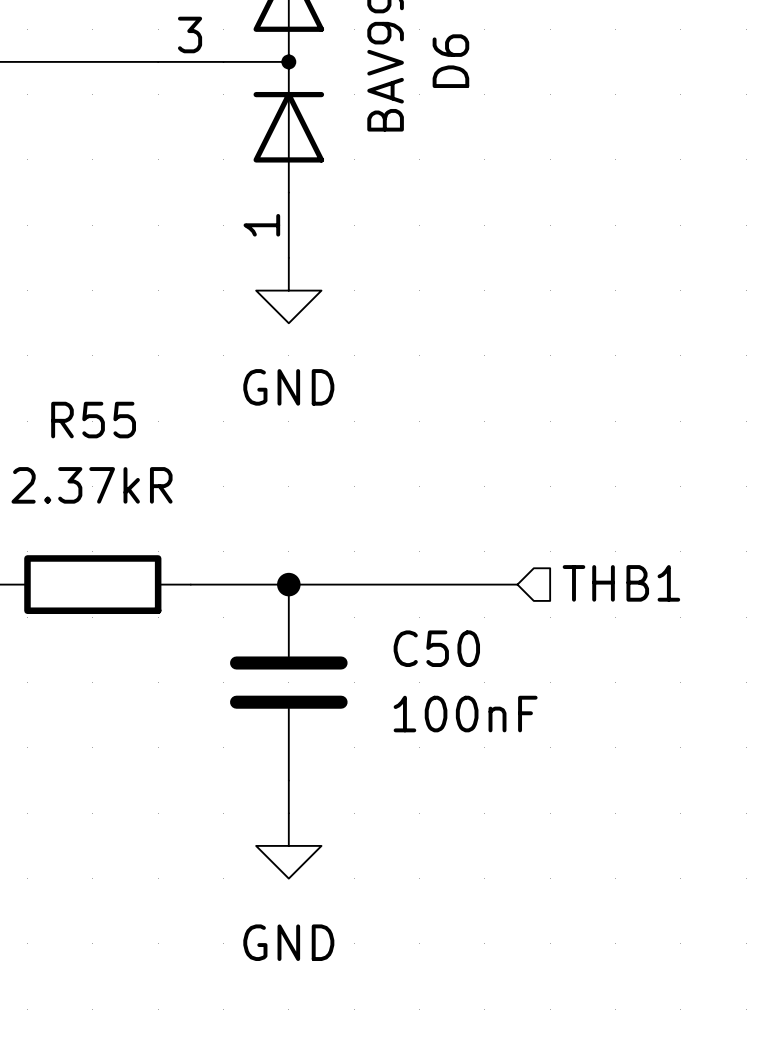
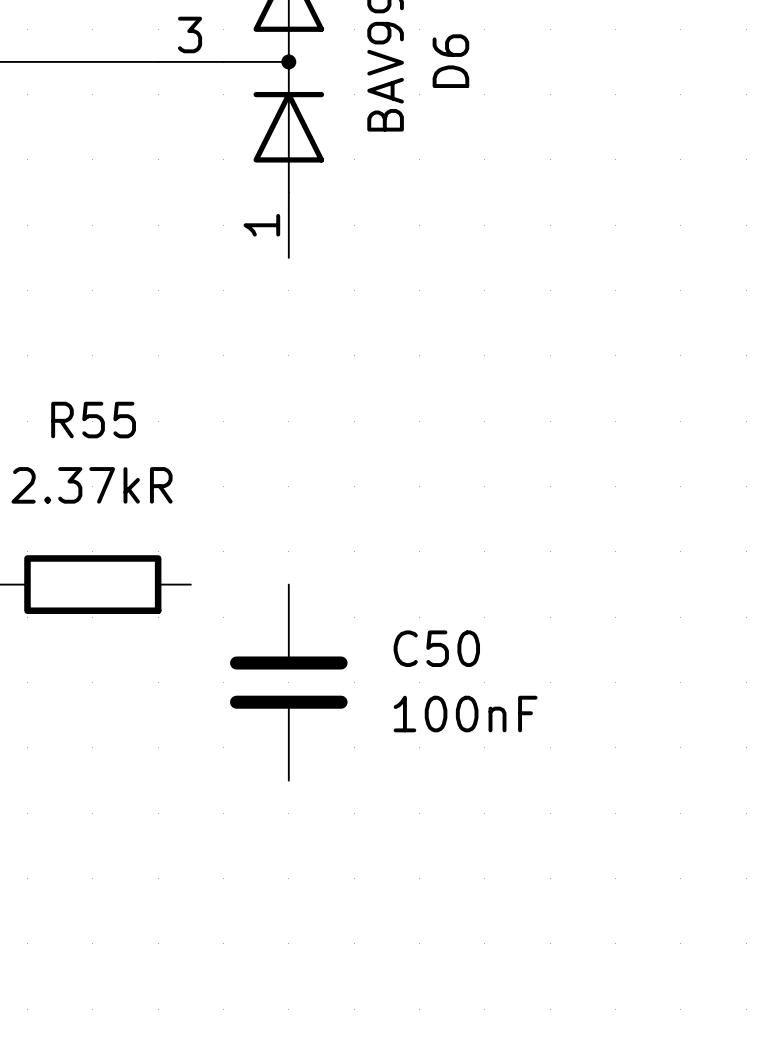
power symbol: GND (288, 290) -> none
hierarchical label: THB1 (621, 583) -> none
wire: (190, 584) (517, 584) -> none
junction: (288, 584) -> none
wire: (288, 780) (288, 813) -> none
power symbol: GND (288, 845) -> none

